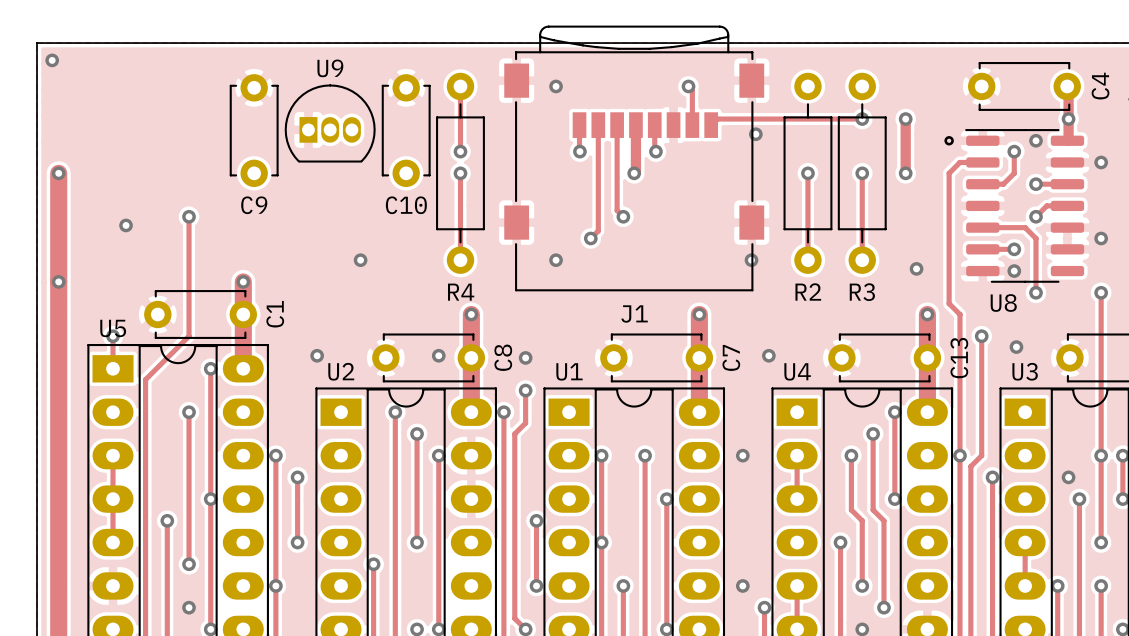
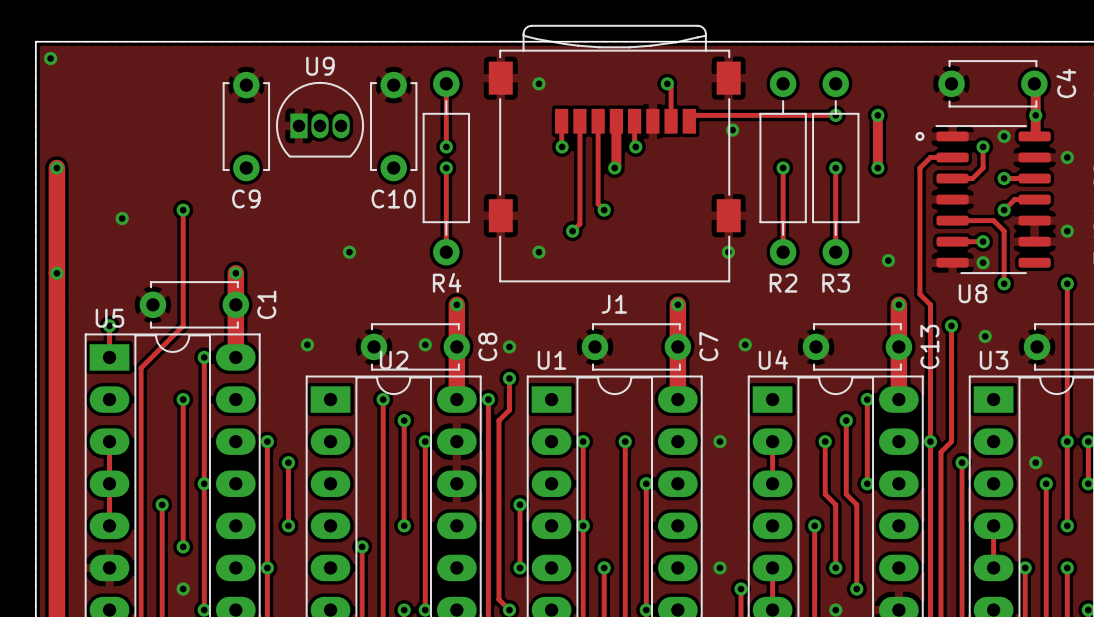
U2 name position: U2 (341, 371) -> U2 (394, 360)

